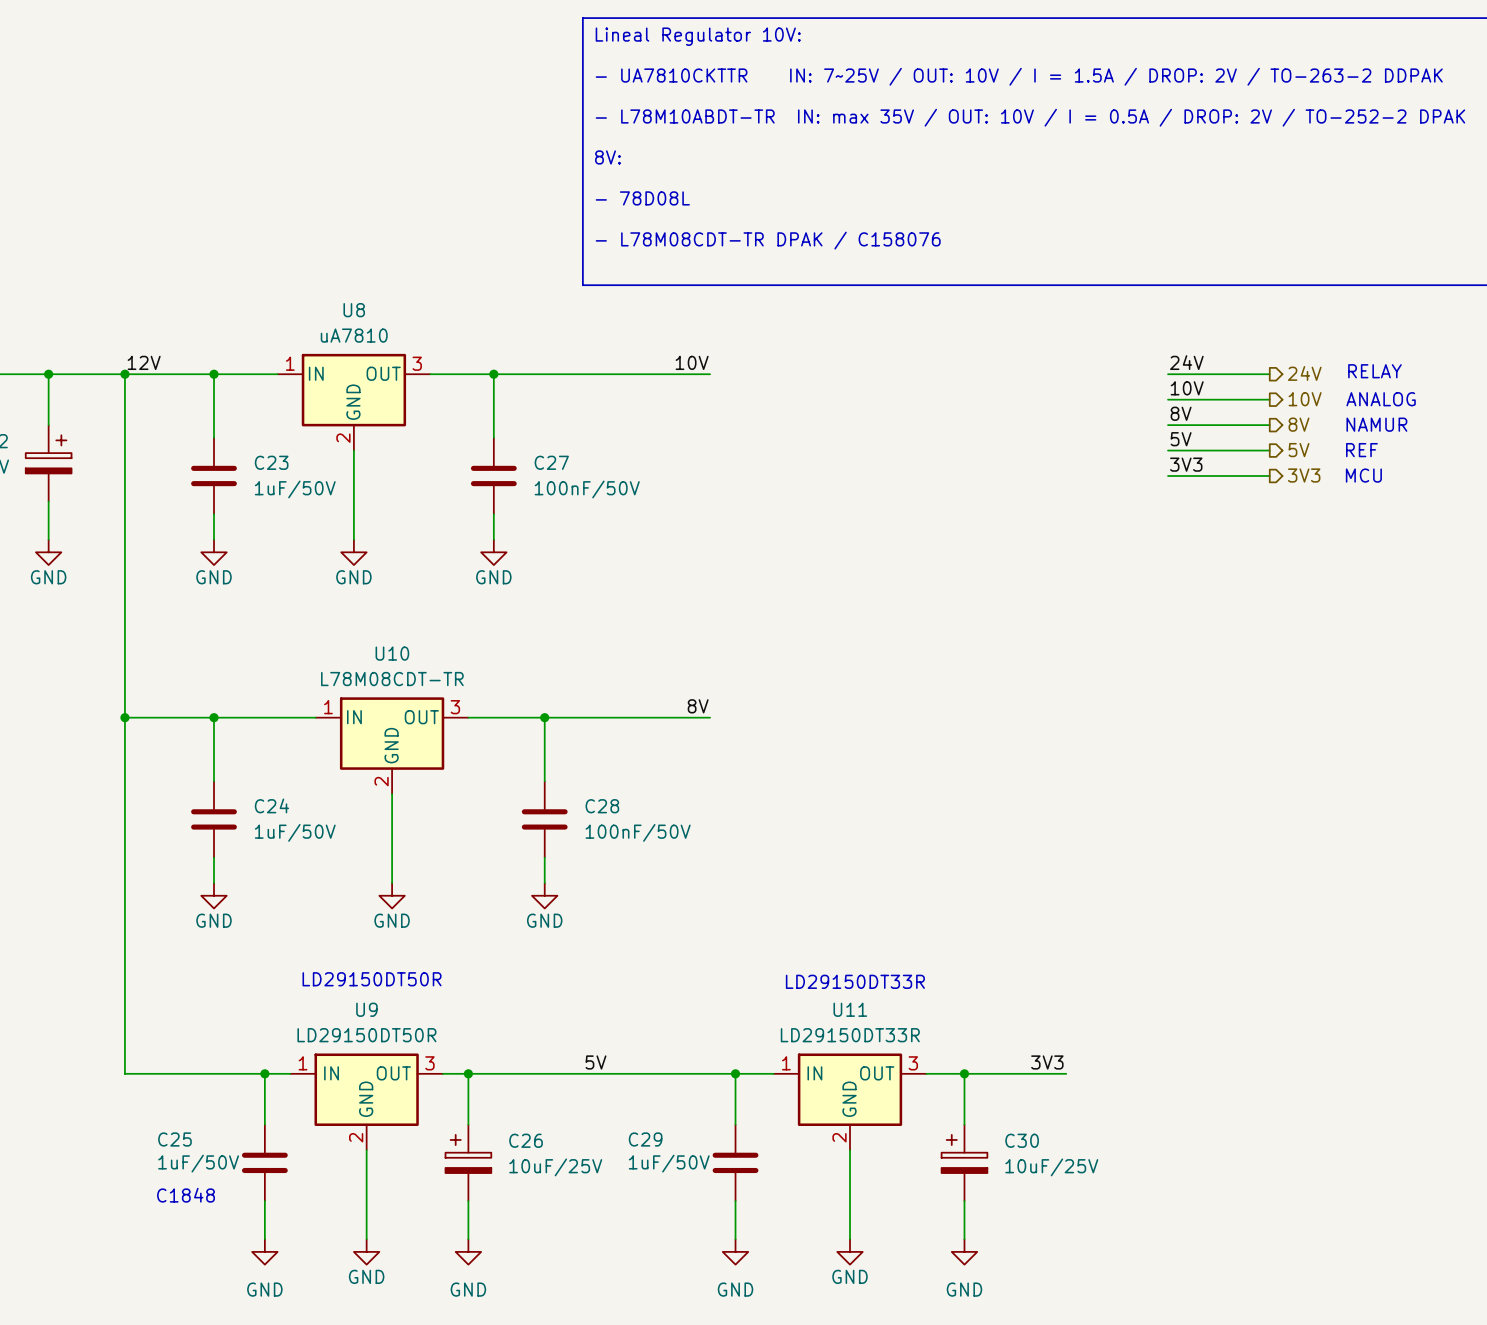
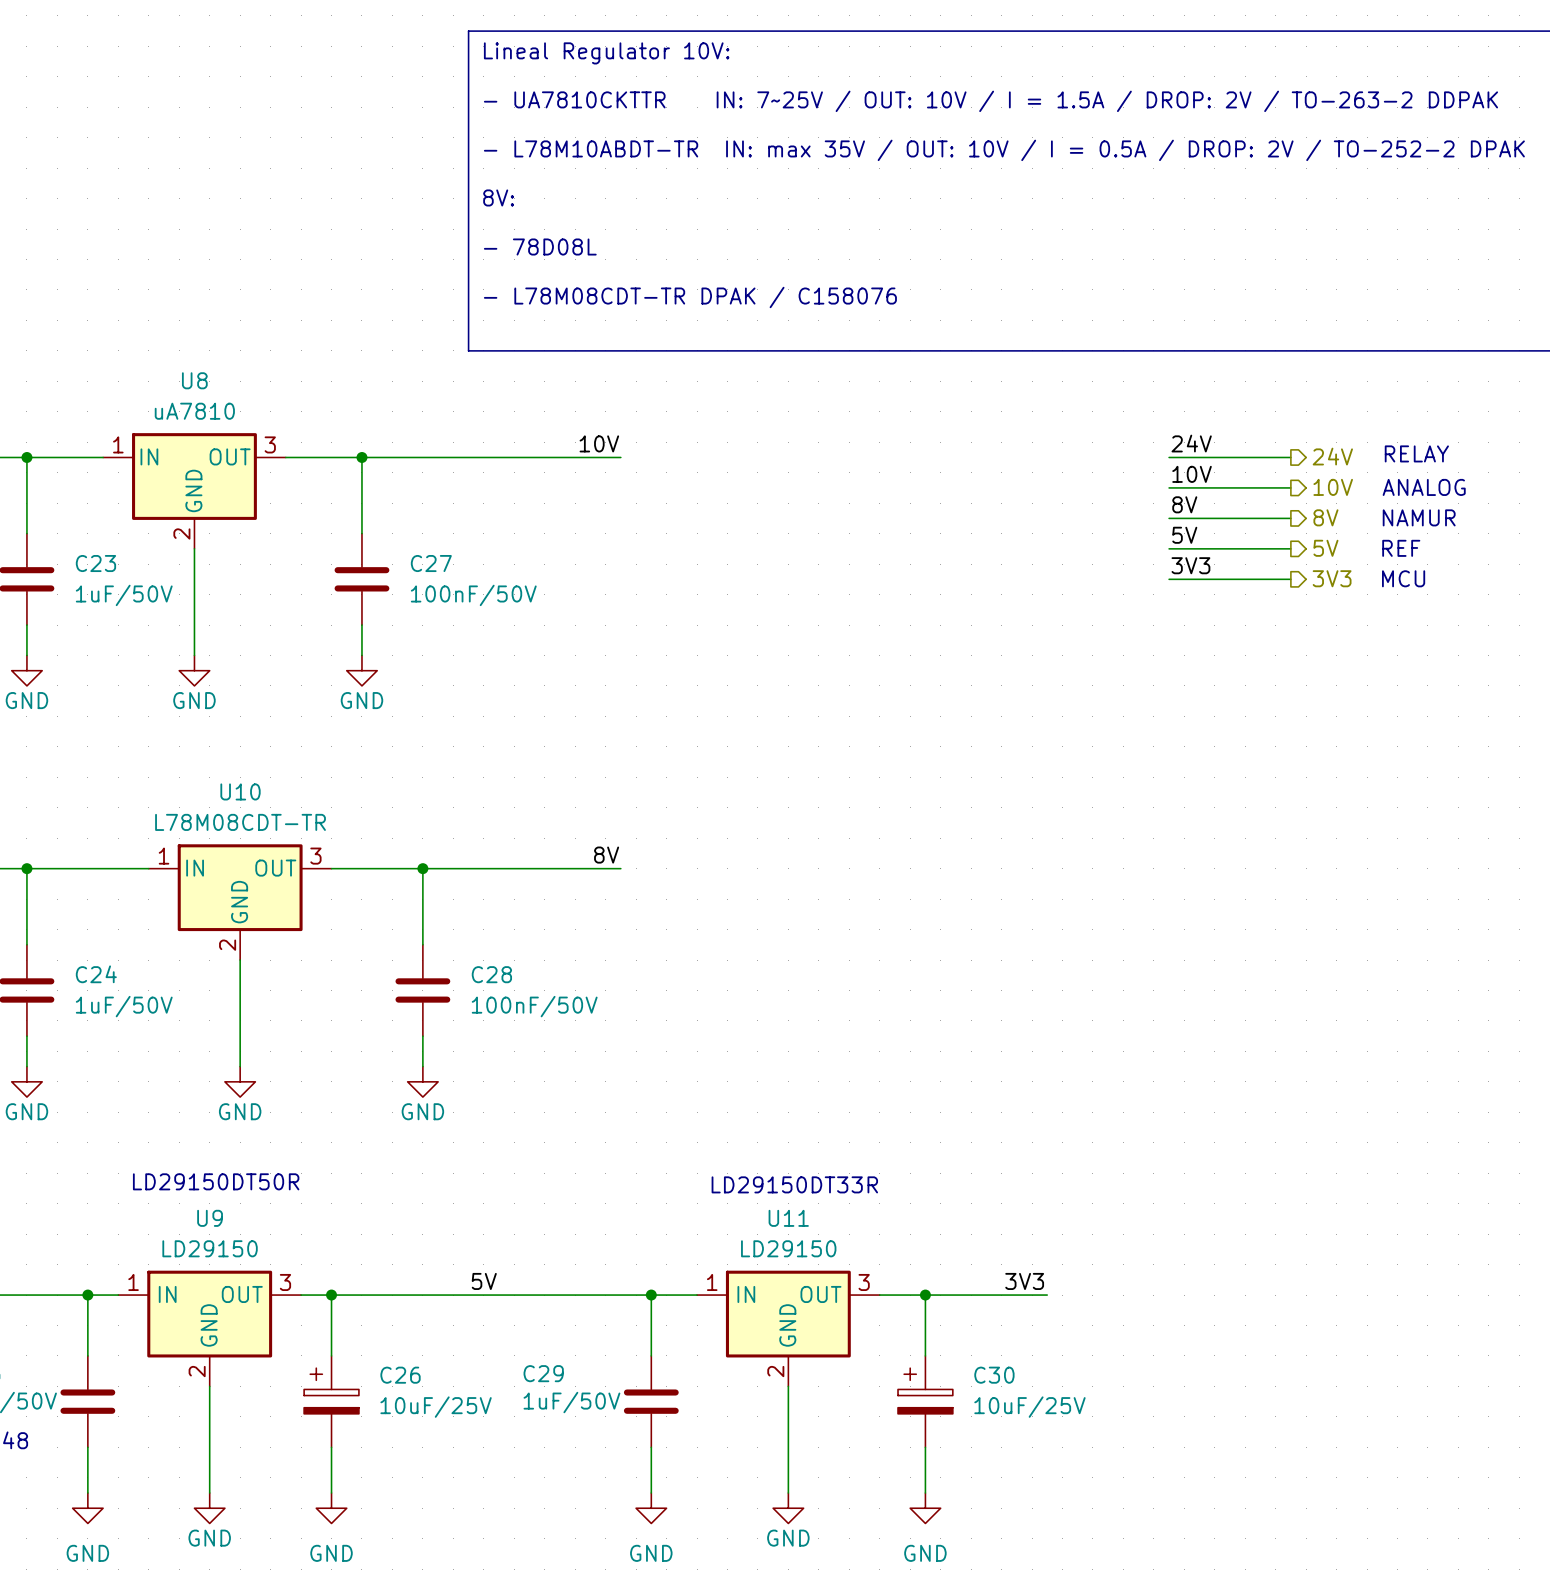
U9 value: LD29150DT50R (366, 1035) -> LD29150 (210, 1248)
U11 value: LD29150DT33R (850, 1035) -> LD29150 (788, 1248)

